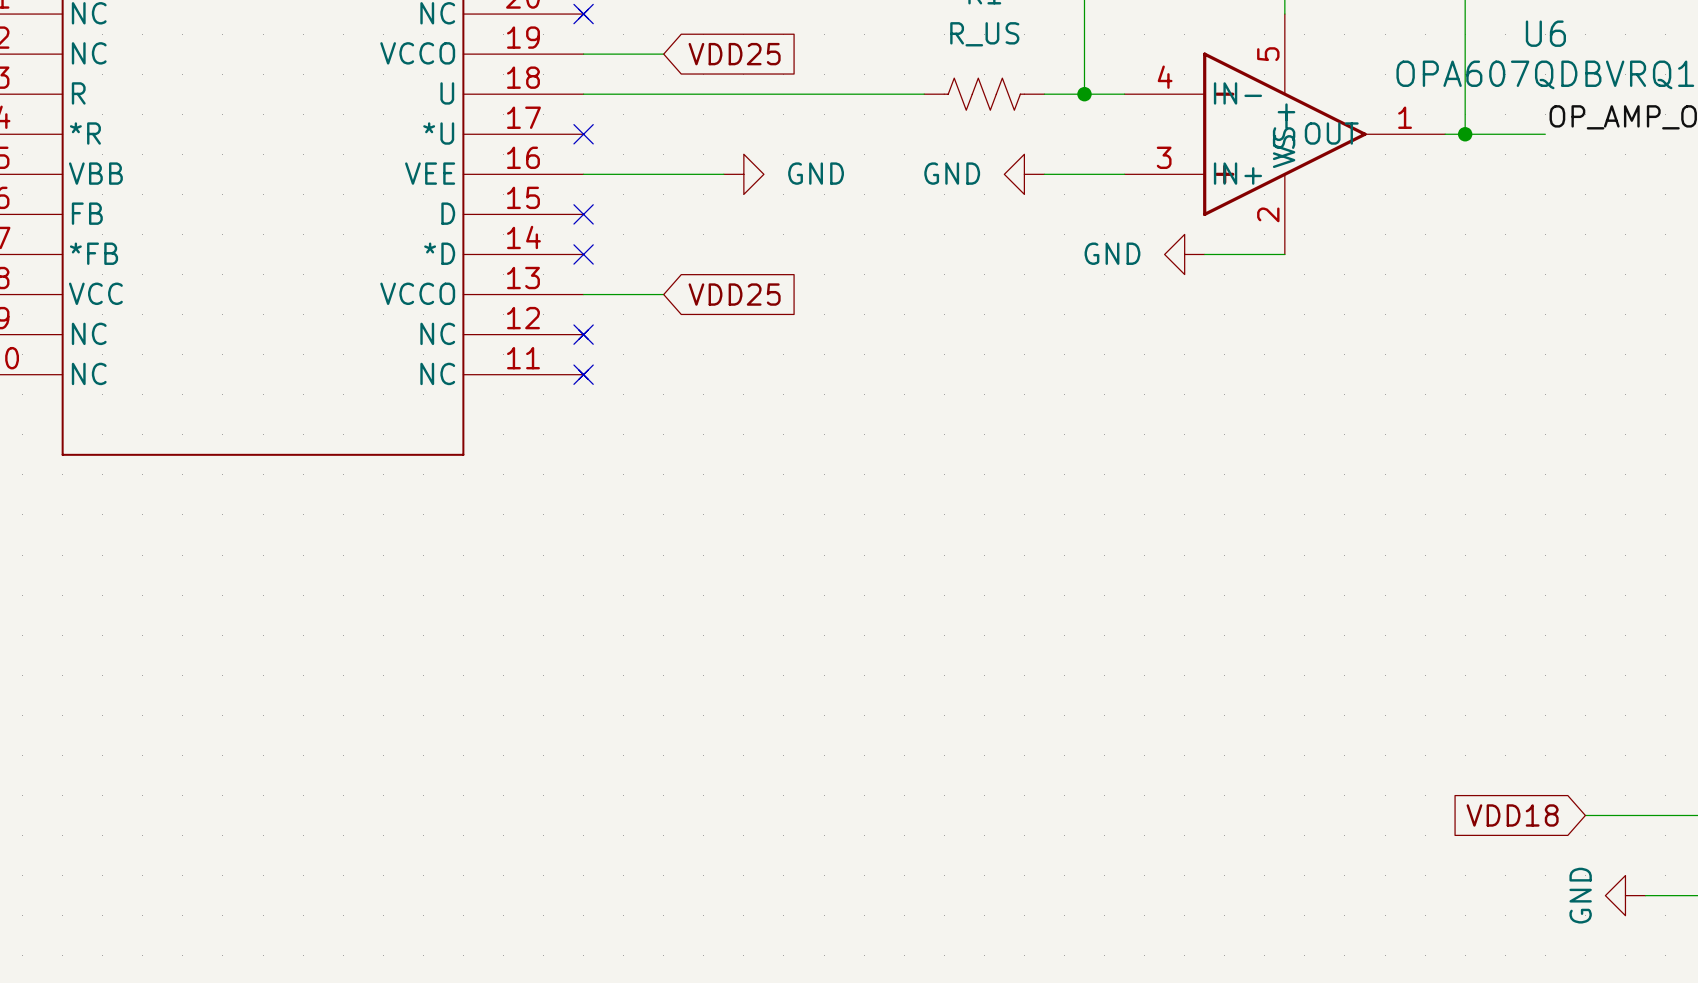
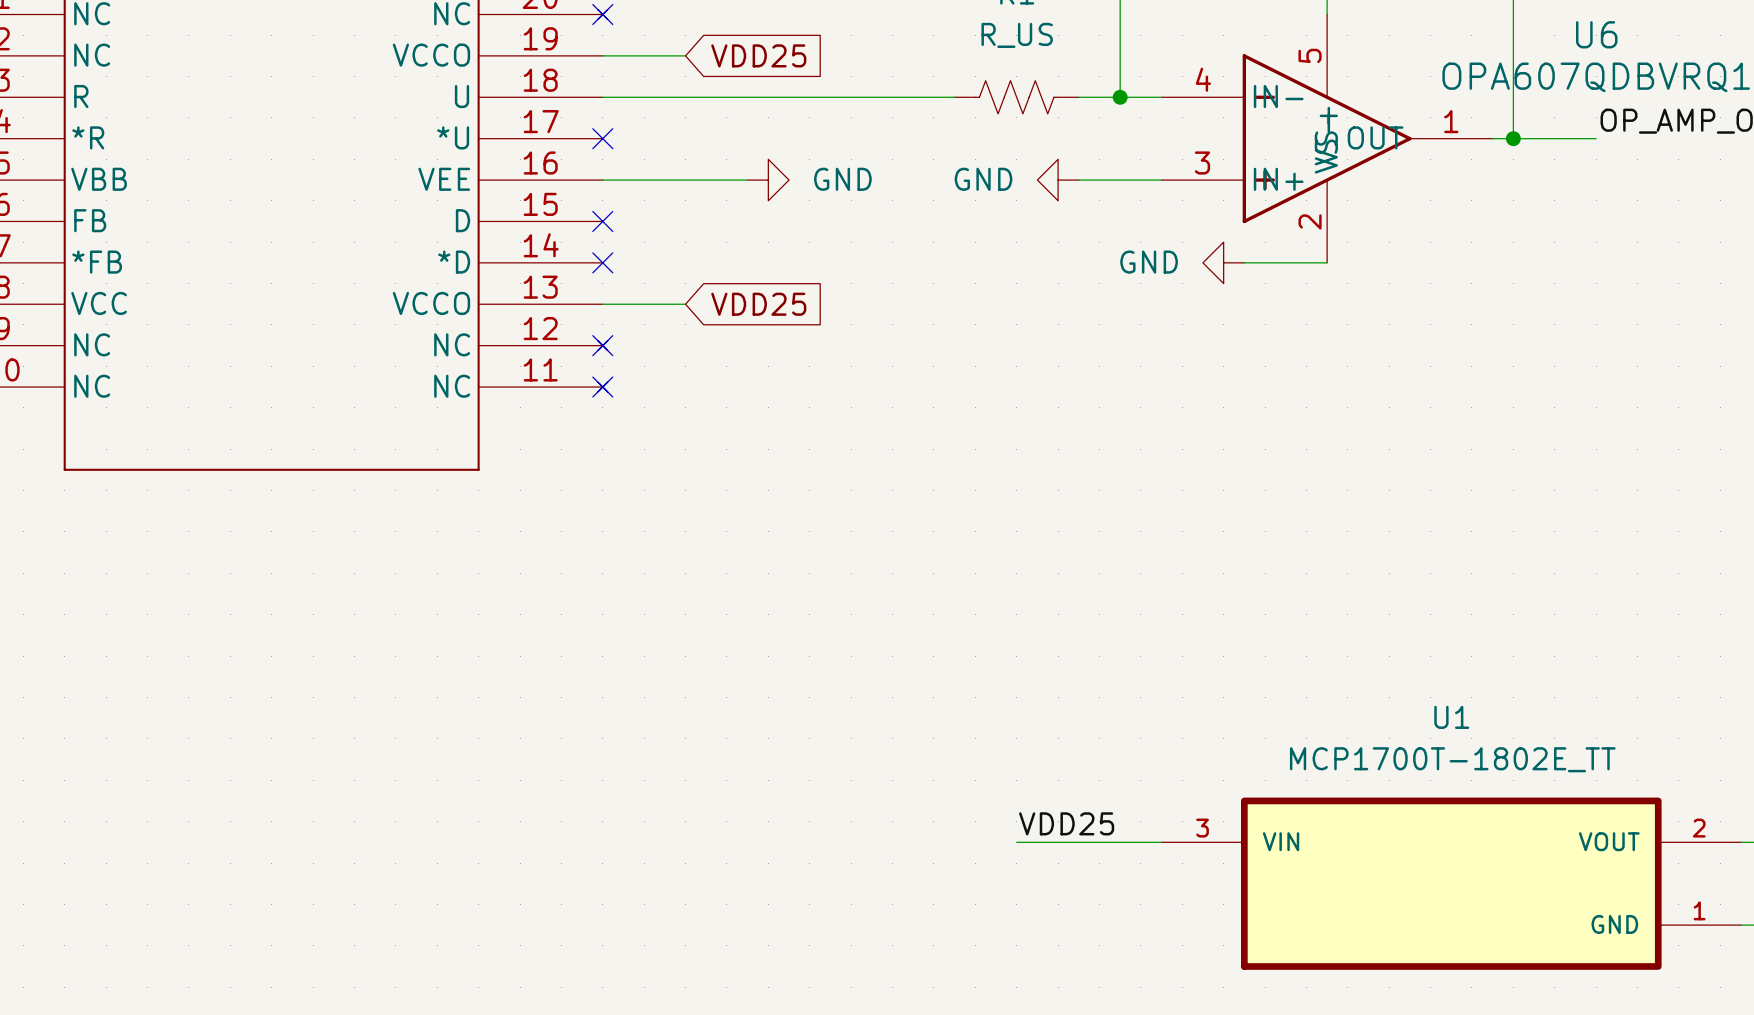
label: none -> VDD25 (1066, 823)
wire: none -> (1016, 842) (1161, 842)
global label: VDD18 (1512, 815) -> none
U1: none -> MCP1700T-1802E_TT (1451, 883)
power symbol: GND (1625, 895) -> none

